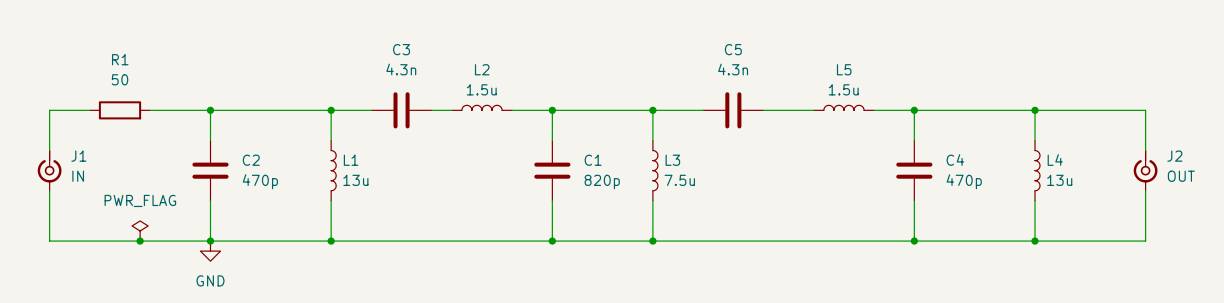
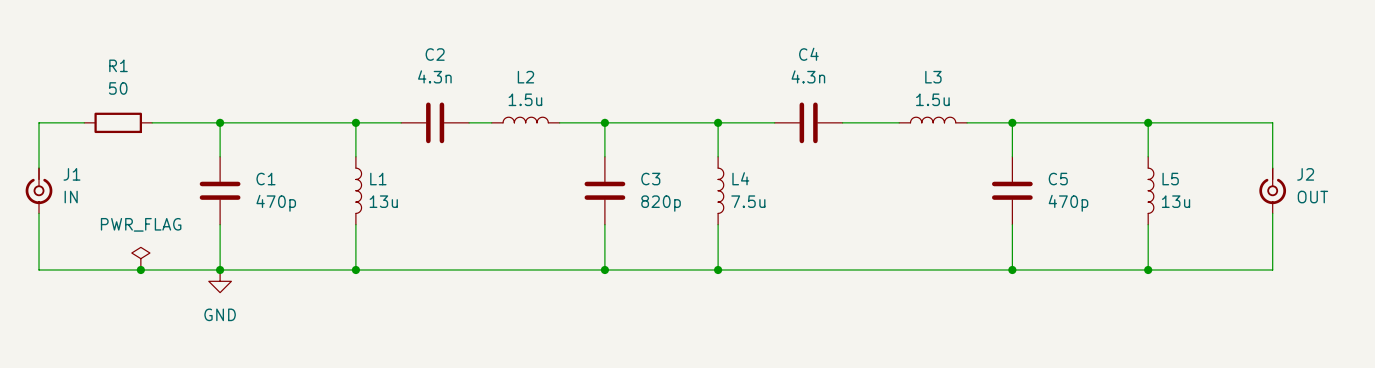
C3 name: C3 (401, 49) -> C2 (435, 54)
C5 name: C5 (733, 49) -> C4 (808, 54)
L5 name: L5 (844, 69) -> L3 (933, 77)
C2 name: C2 (251, 160) -> C1 (265, 179)
C1 name: C1 (593, 160) -> C3 (650, 179)
L3 name: L3 (672, 160) -> L4 (740, 178)
C4 name: C4 (955, 160) -> C5 (1058, 179)
L4 name: L4 (1055, 160) -> L5 (1170, 179)

